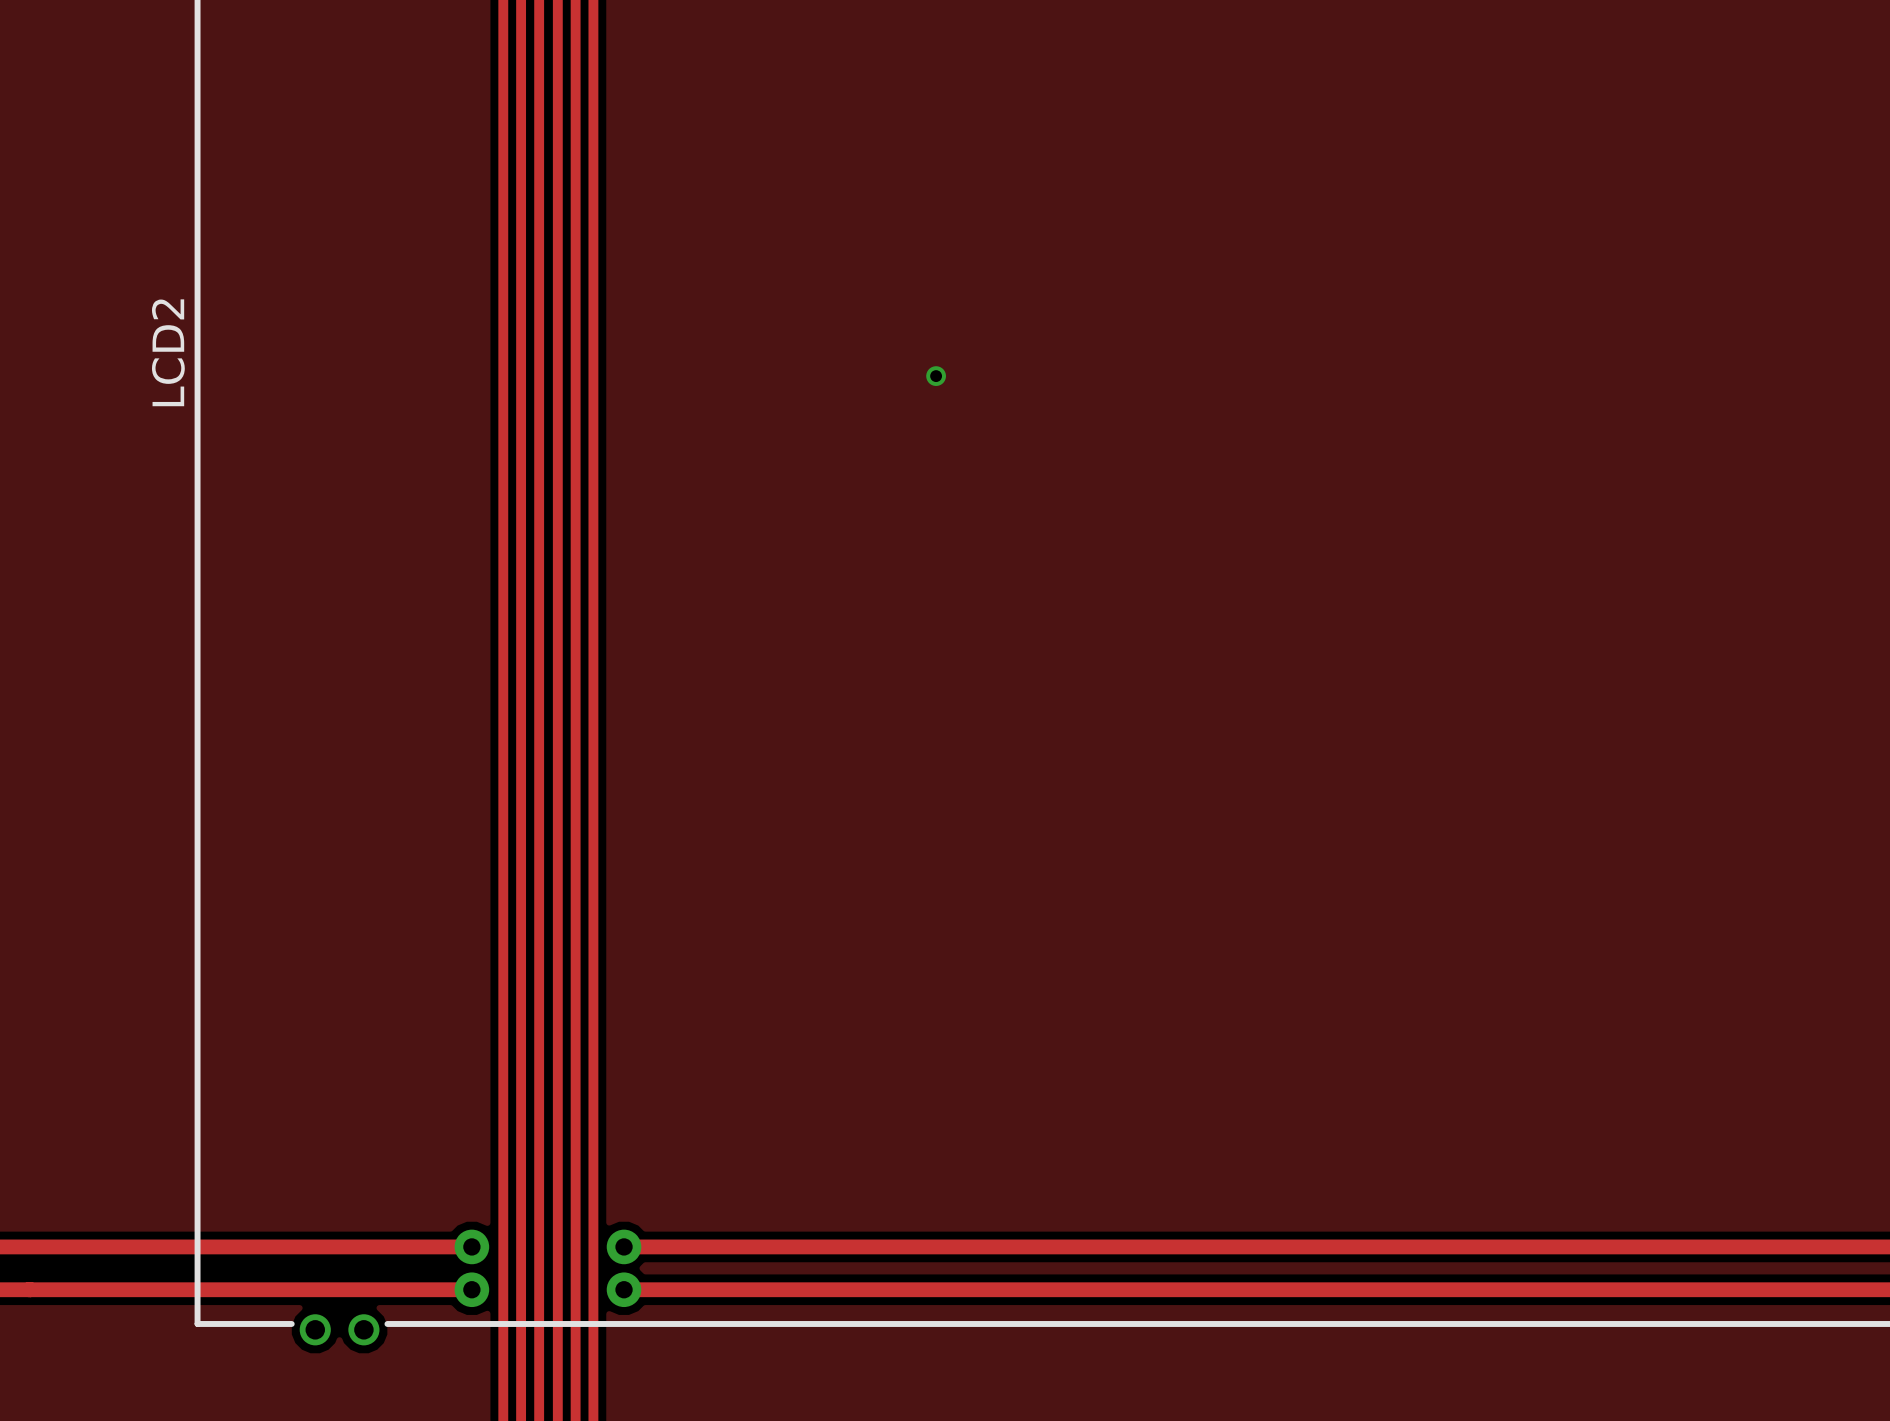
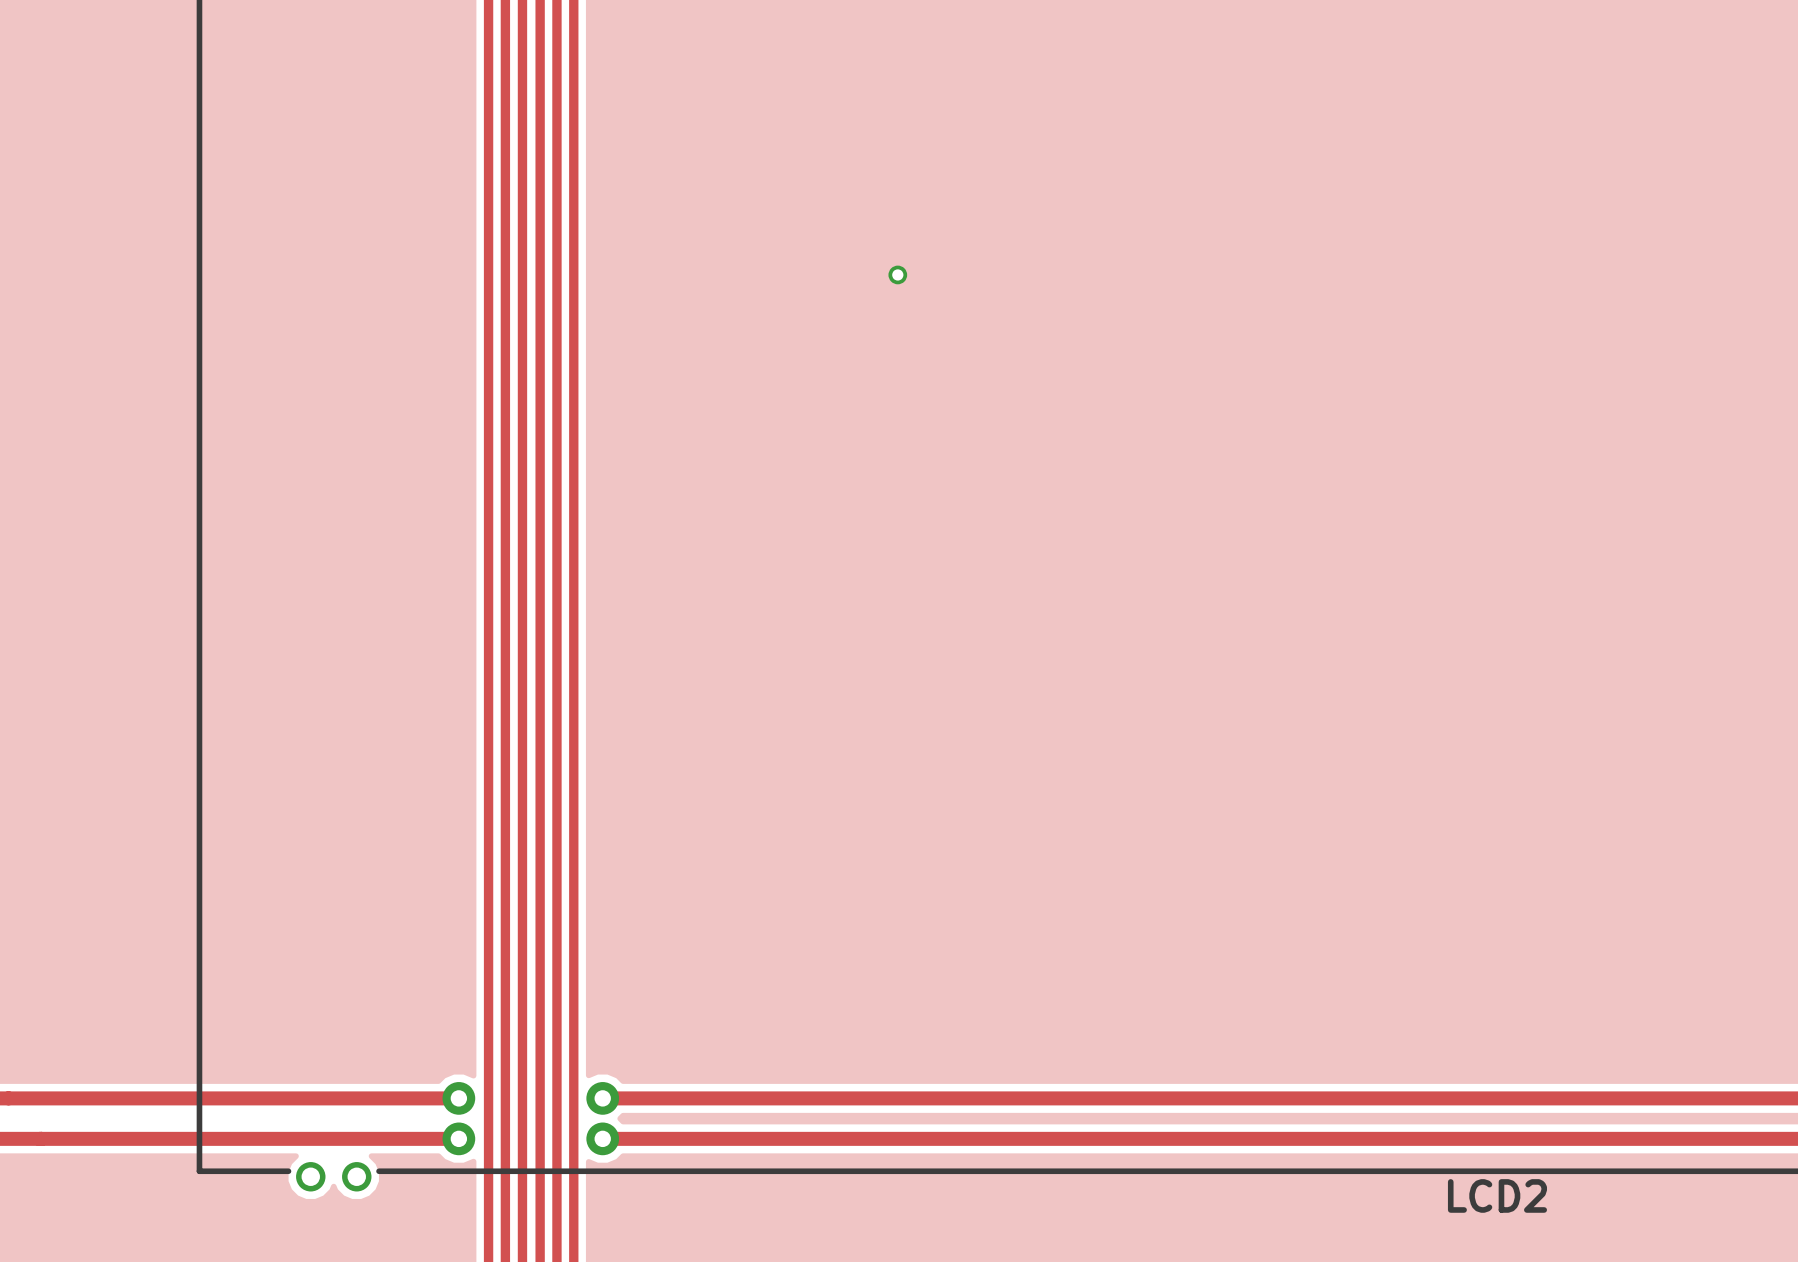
LCD2 name rotation: 0° (168, 352) -> 90° clockwise (1497, 1195)
LCD2 name position: LCD2 (168, 352) -> LCD2 (1497, 1195)

